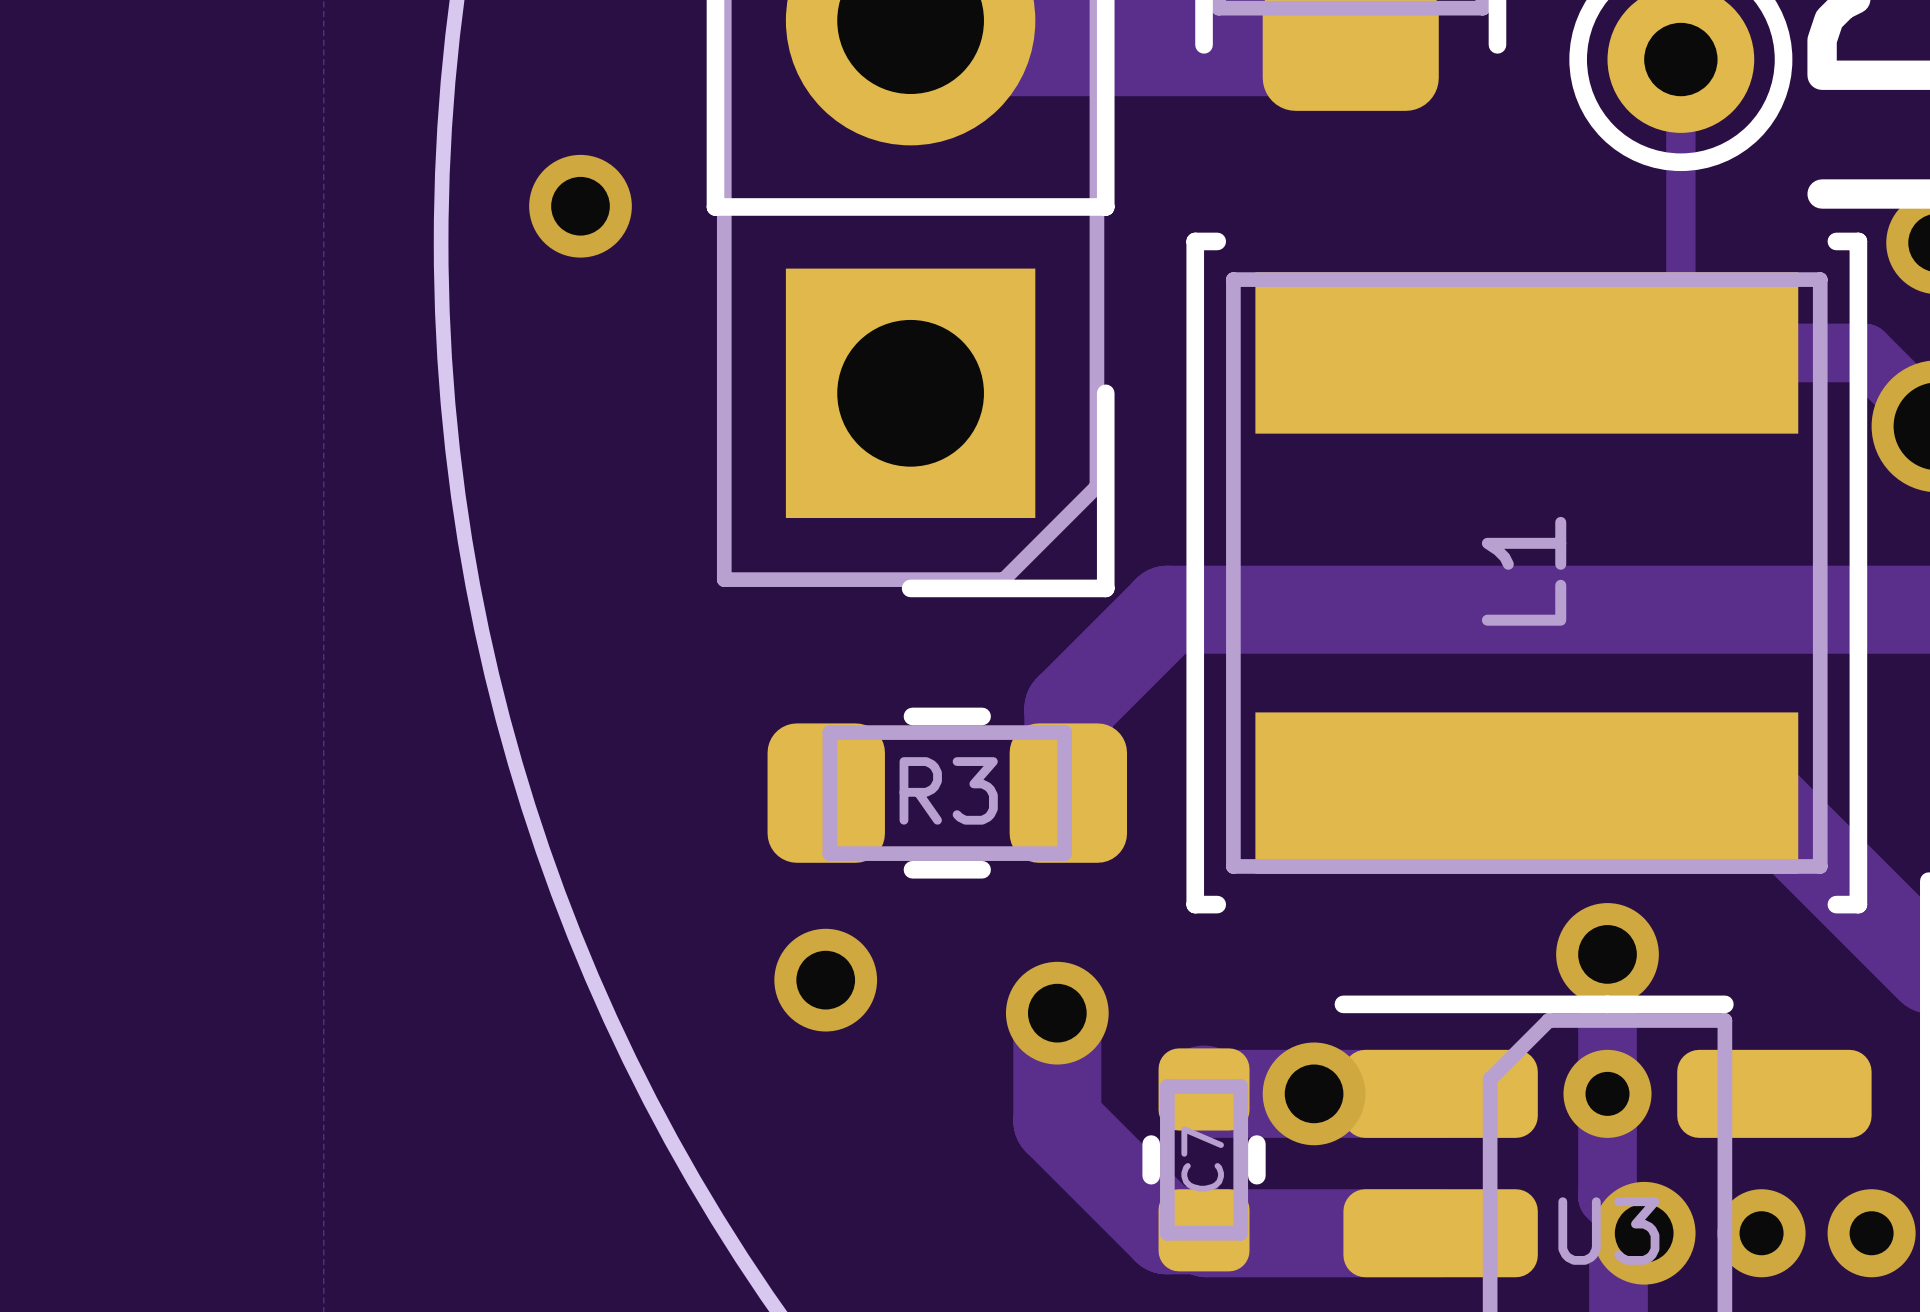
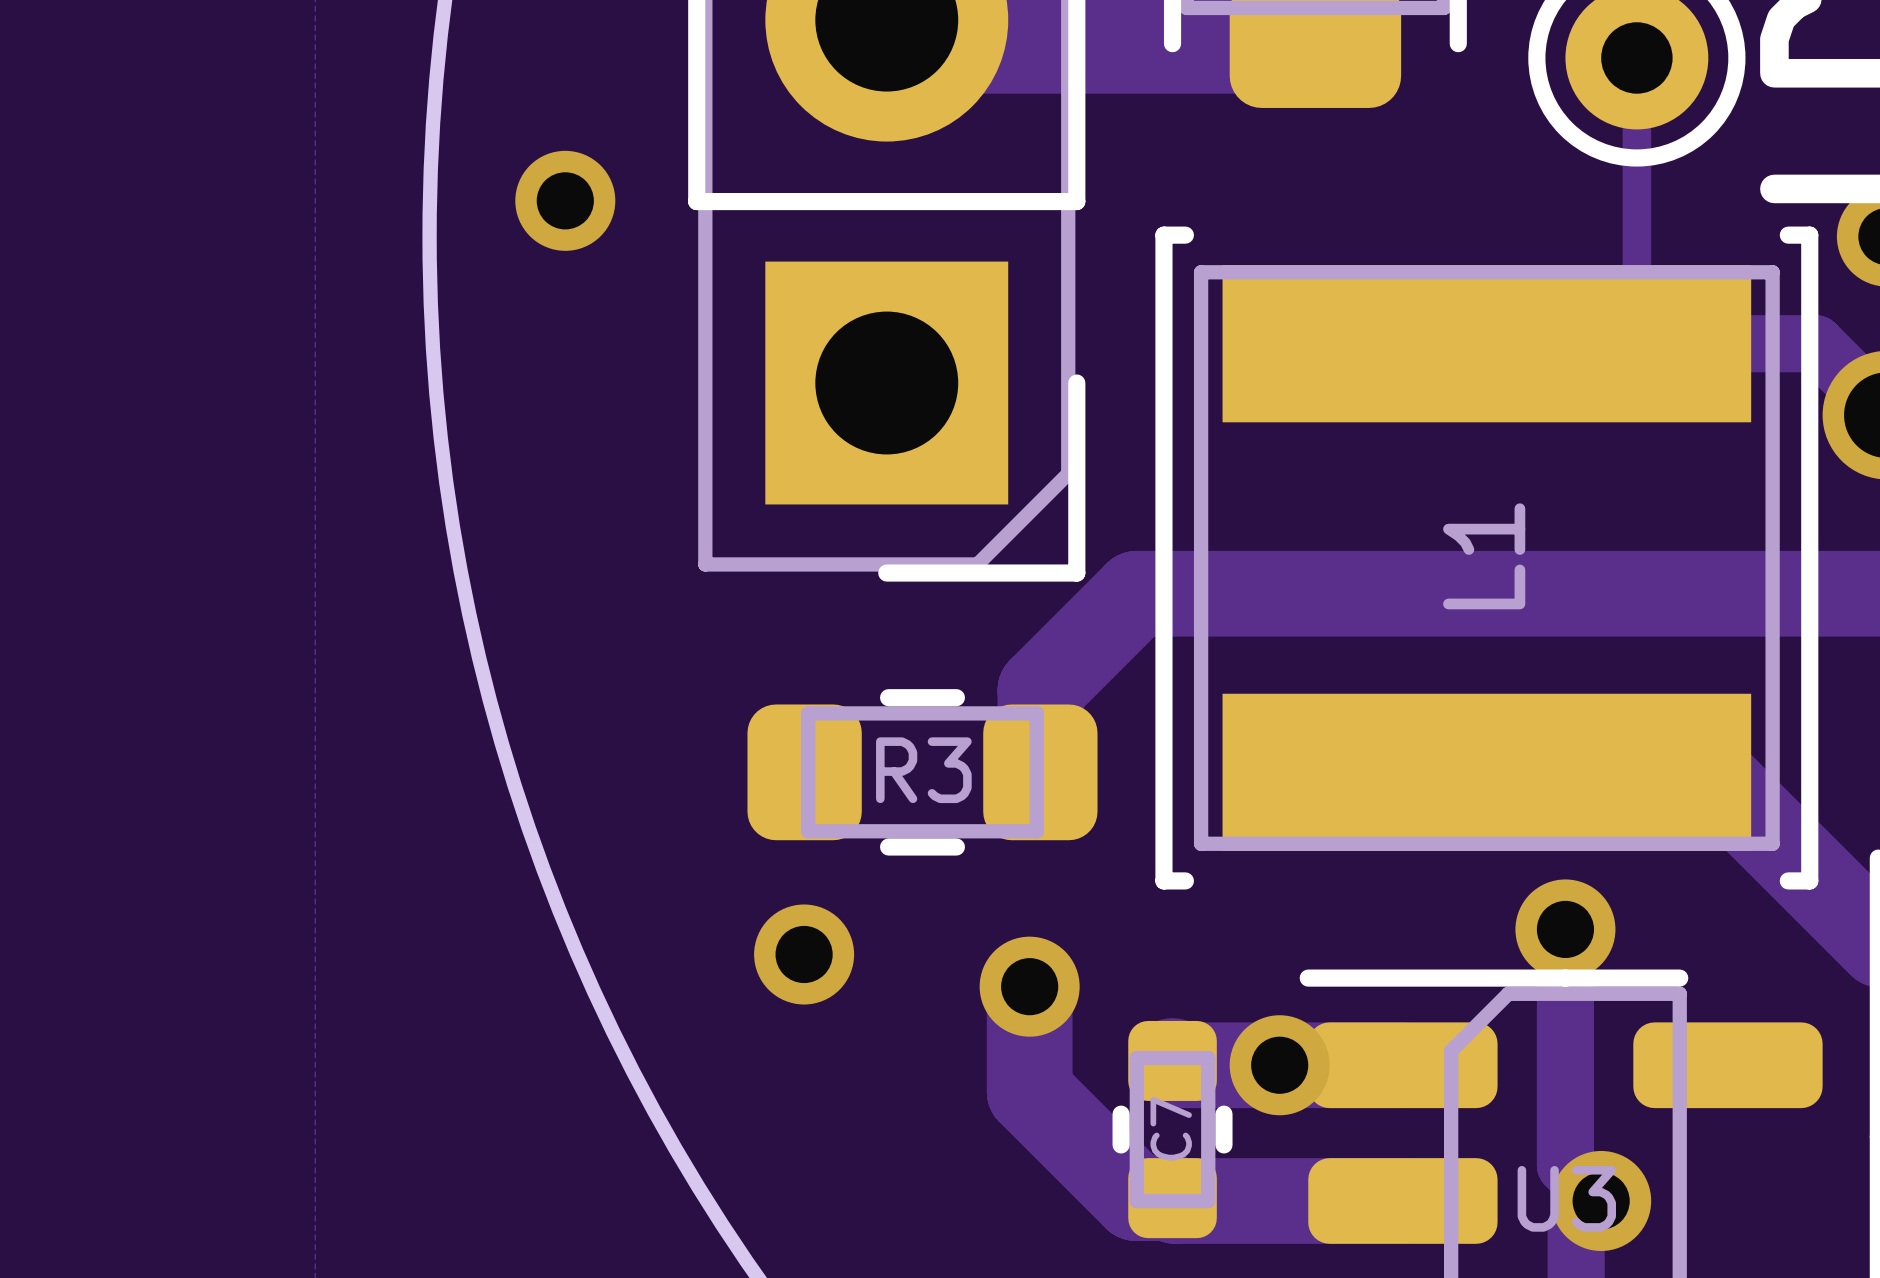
via: (1607, 1093) -> none
via: (1761, 1233) -> none
via: (1871, 1233) -> none

